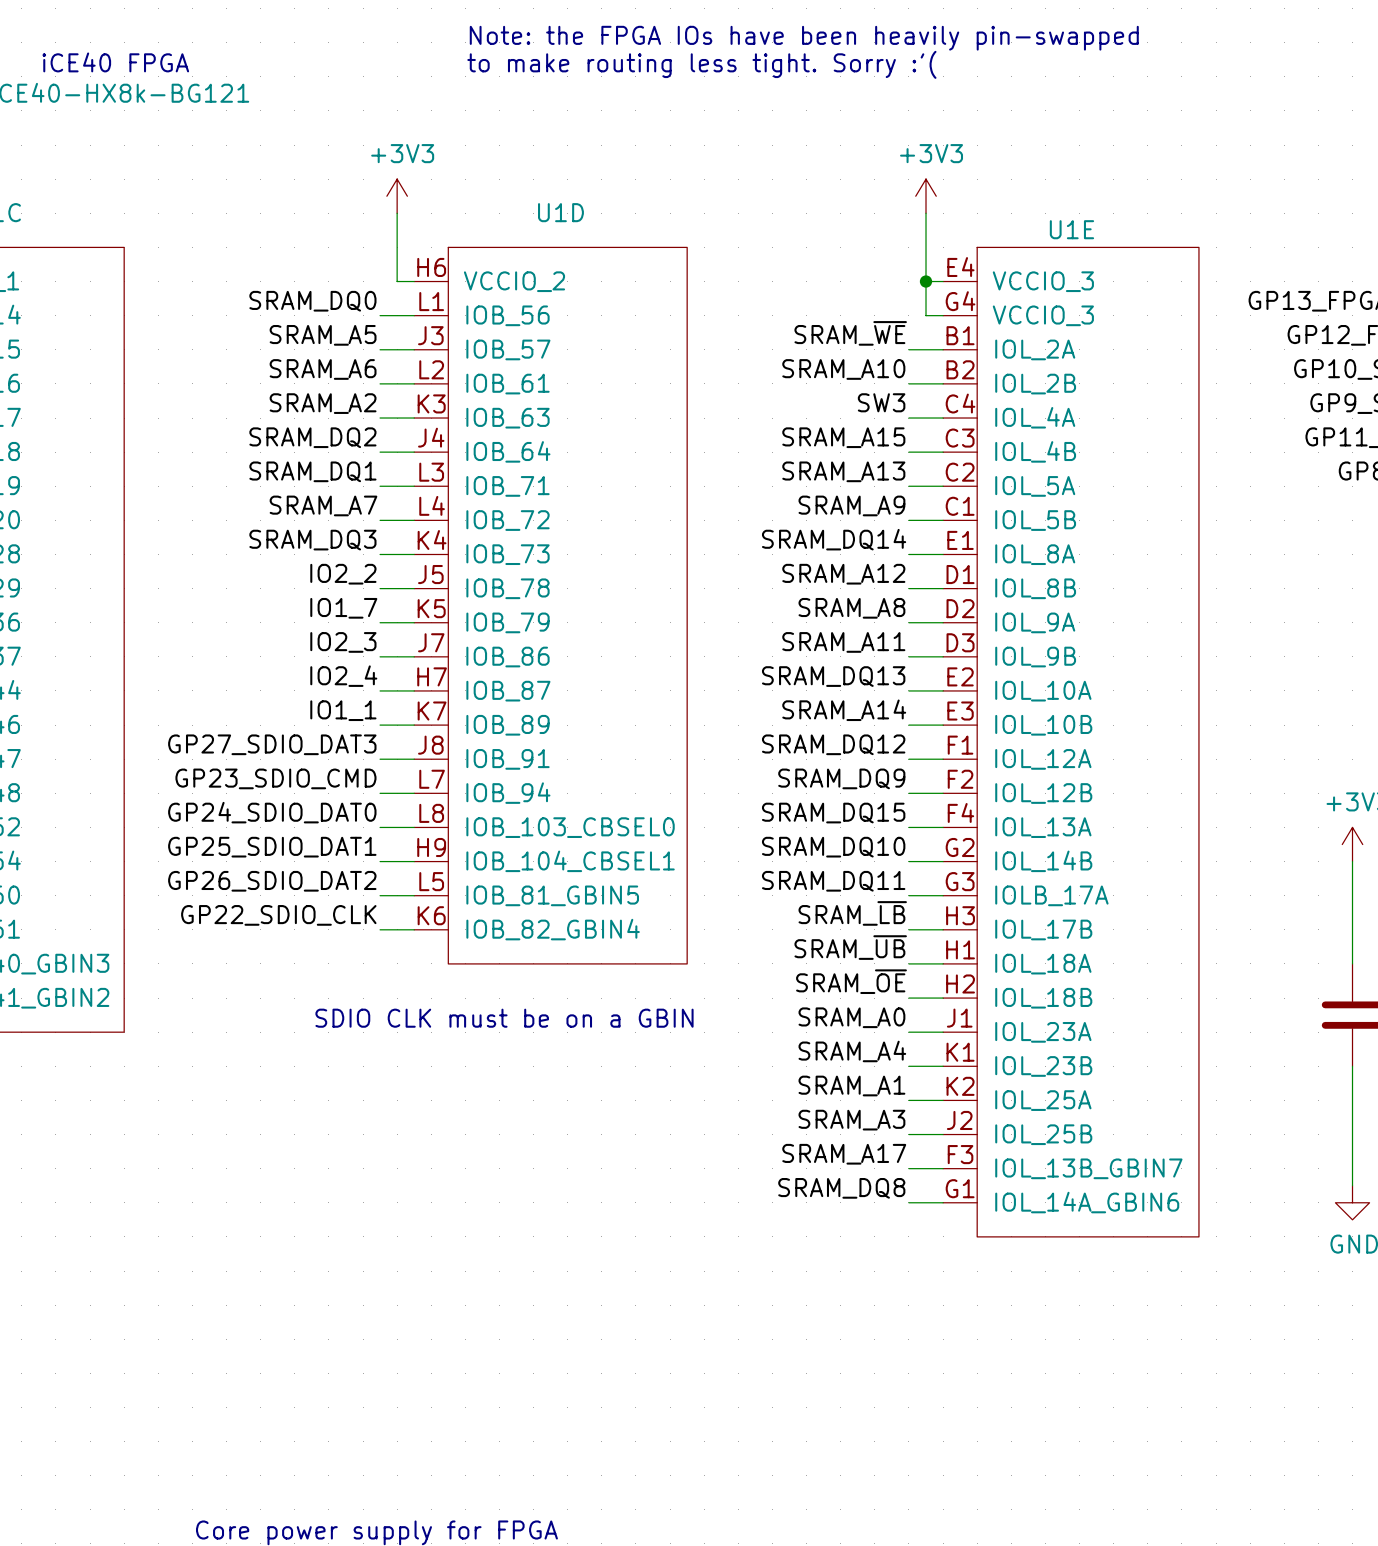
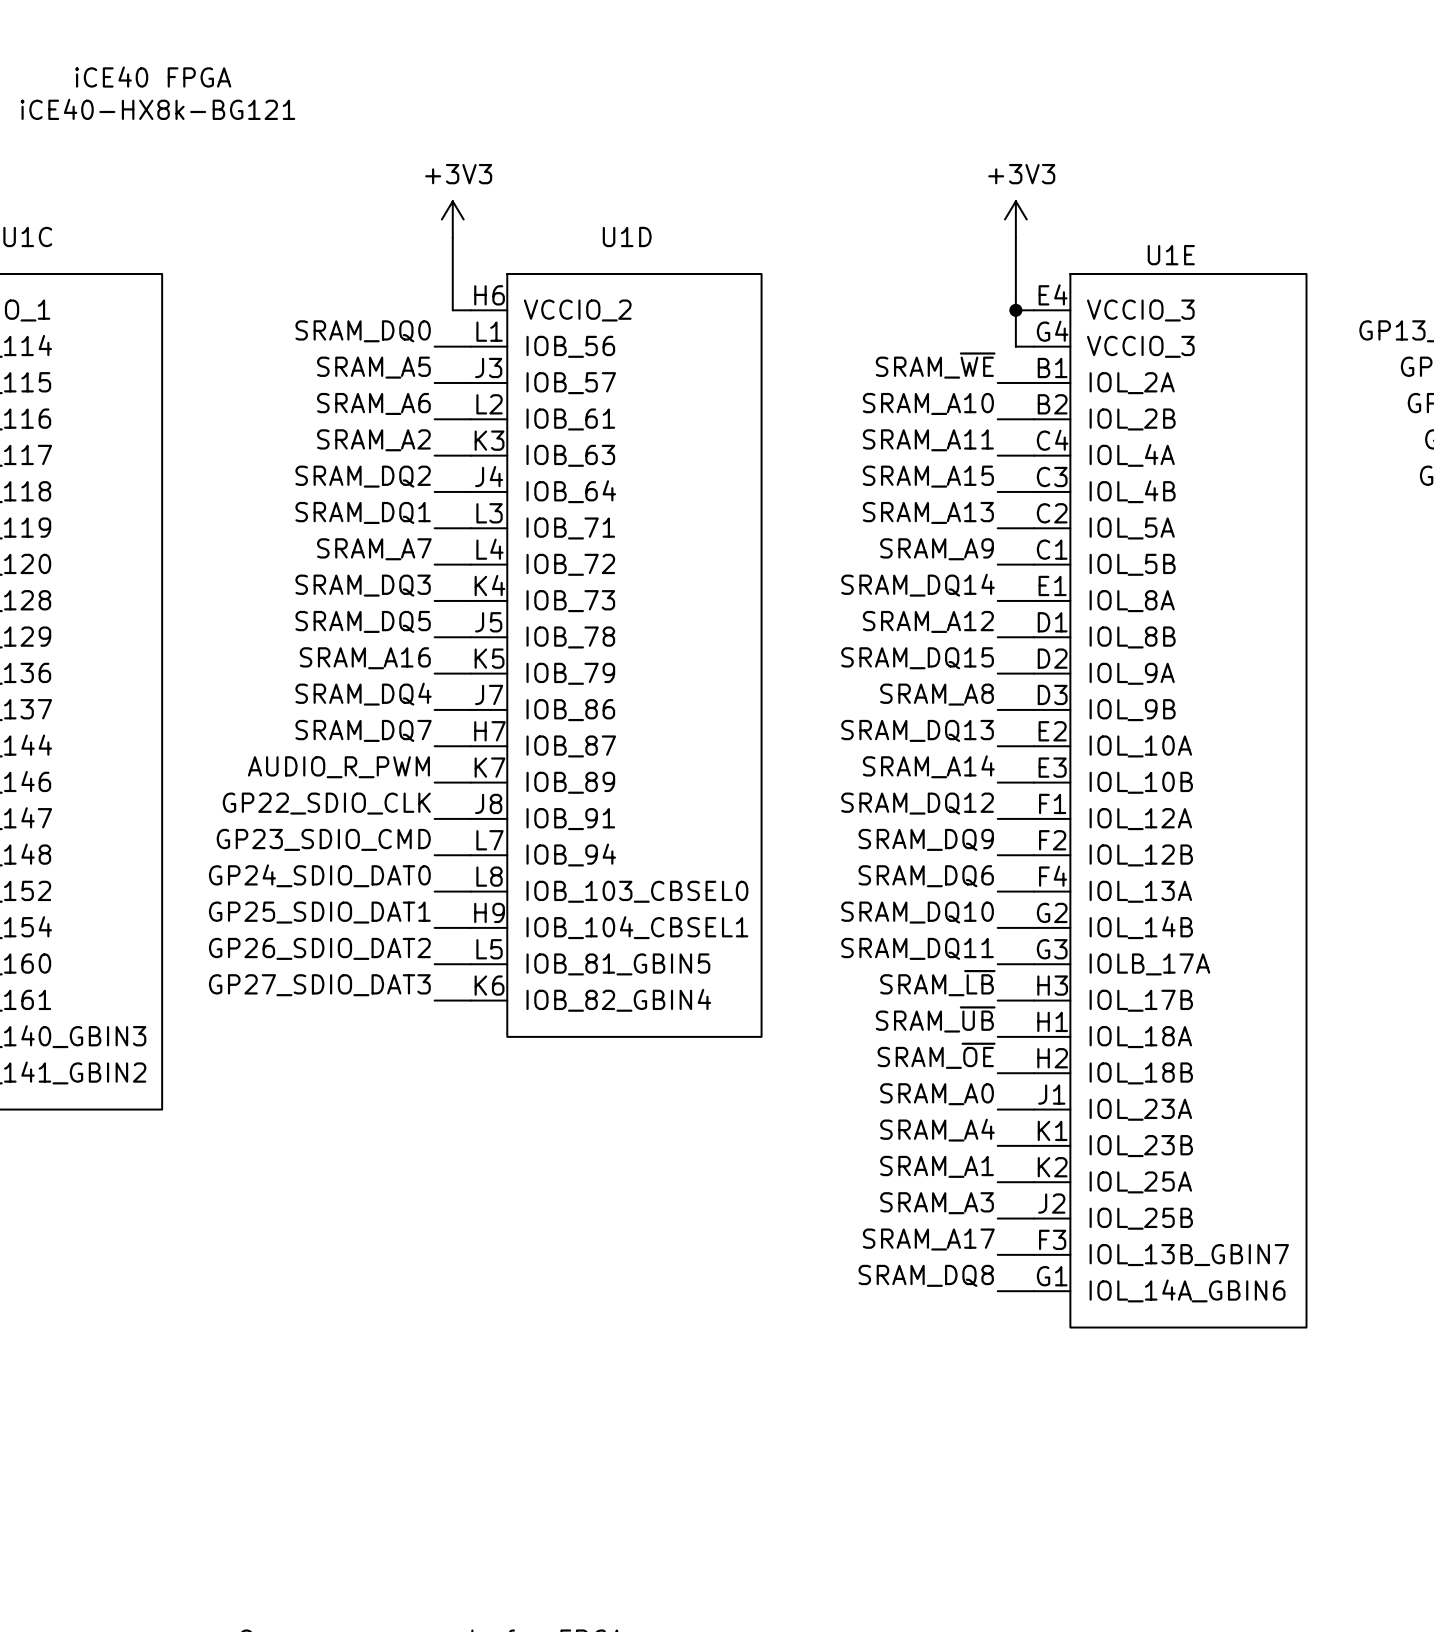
text: Note: the FPGA IOs have been heavily pin-swapped (804, 38) -> none
text: to make routing less tight. Sorry :'( (701, 64) -> none
label: SW3 (881, 402) -> SRAM_A11 (928, 440)
label: IO2_2 (343, 574) -> SRAM_DQ5 (363, 621)
label: IO1_7 (343, 608) -> SRAM_A16 (365, 658)
label: SRAM_A8 (851, 608) -> SRAM_DQ15 (917, 658)
label: IO2_3 (343, 642) -> SRAM_DQ4 (363, 694)
label: SRAM_A11 (843, 642) -> SRAM_A8 (937, 694)
label: IO2_4 (343, 676) -> SRAM_DQ7 (363, 730)
label: IO1_1 (343, 710) -> AUDIO_R_PWM (338, 767)
label: GP27_SDIO_DAT3 (272, 744) -> GP22_SDIO_CLK (326, 803)
label: SRAM_DQ15 (833, 813) -> SRAM_DQ6 (926, 876)
label: GP22_SDIO_CLK (278, 915) -> GP27_SDIO_DAT3 (319, 985)
text: SDIO CLK must be on a GBIN (504, 1018) -> none

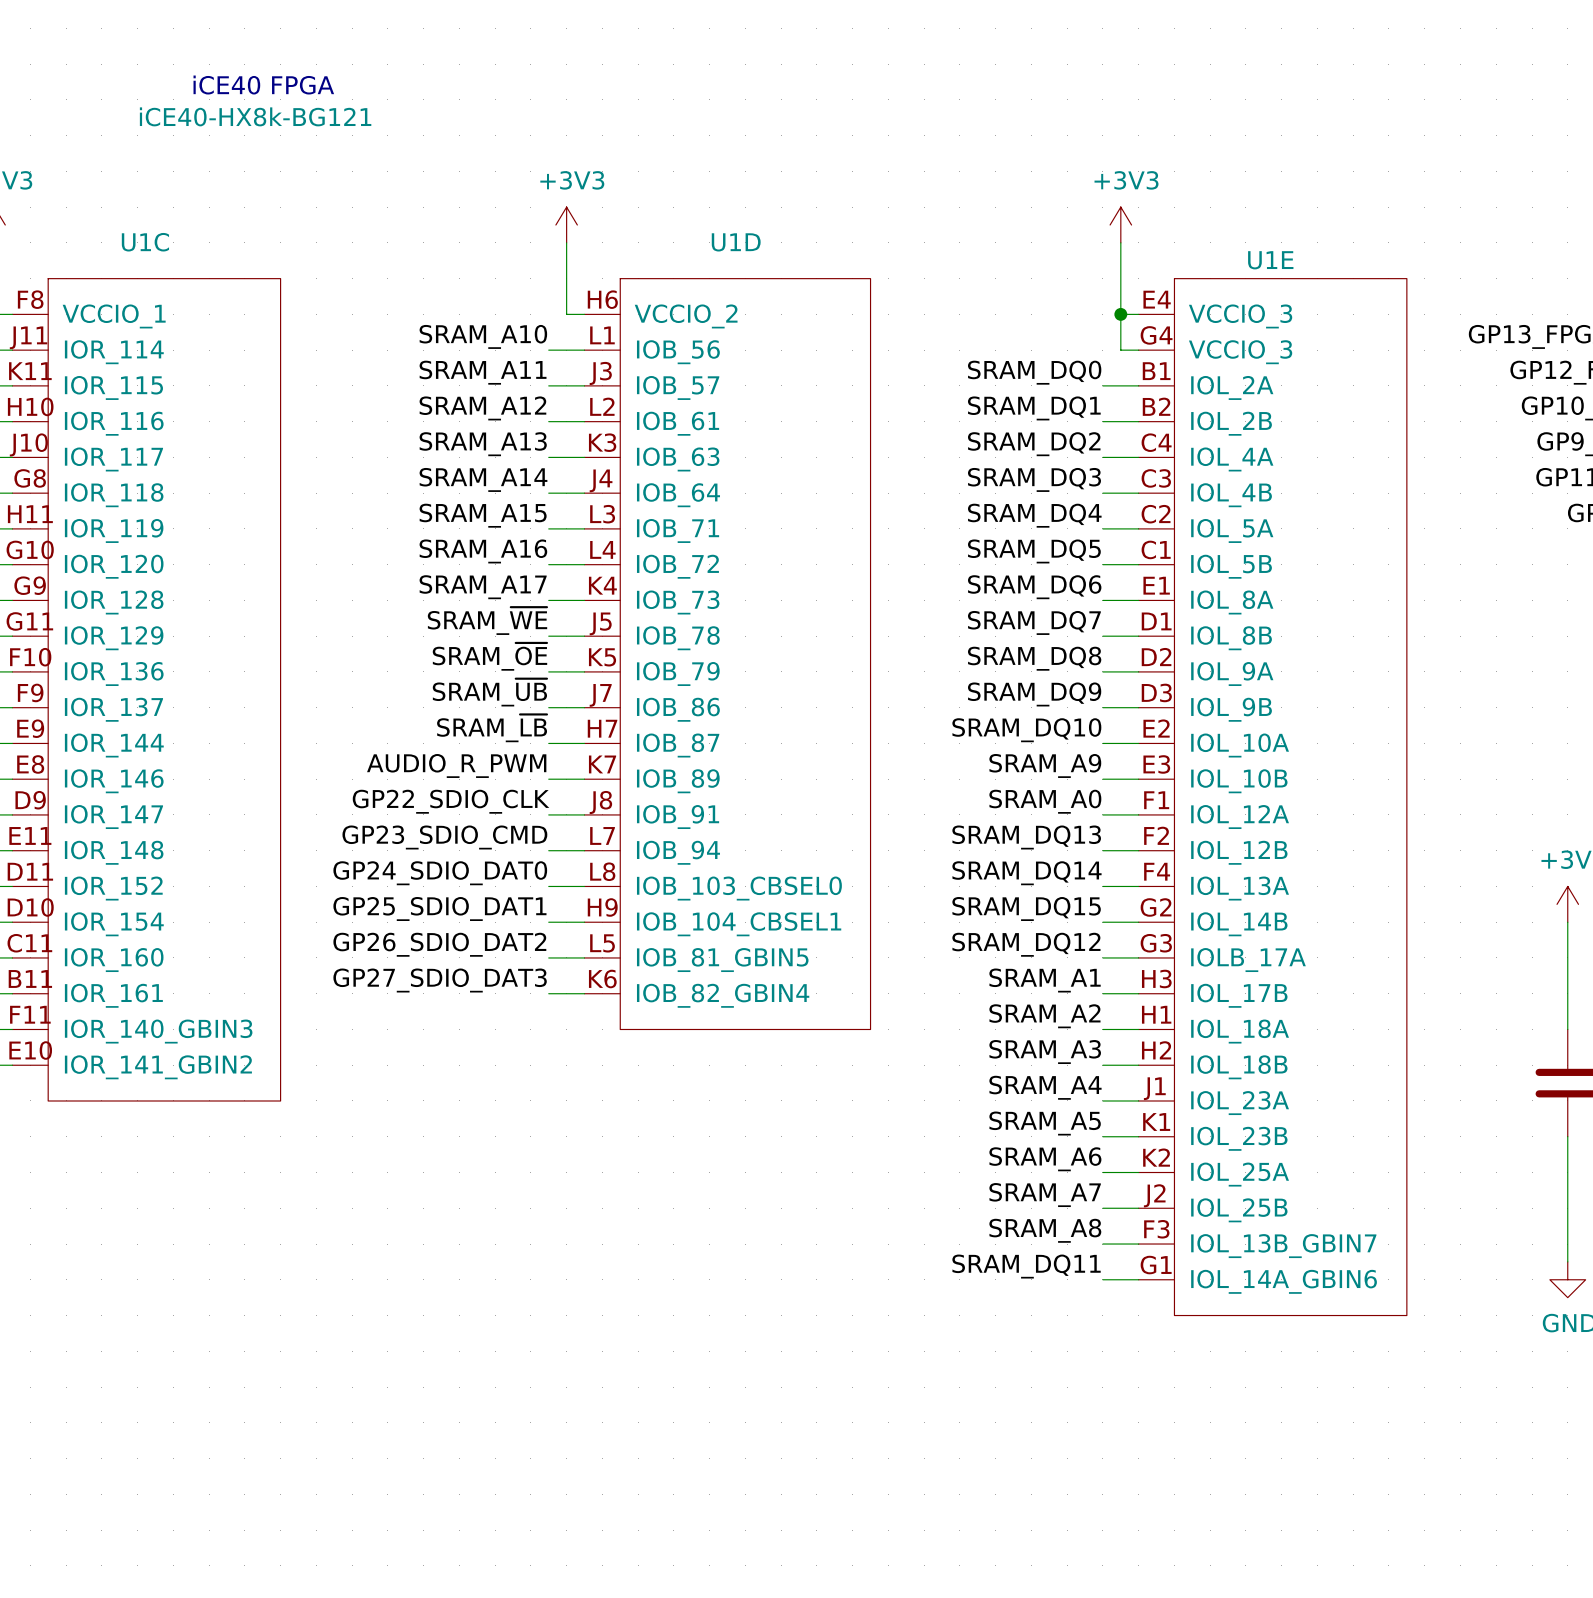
label: SRAM_DQ0 (363, 331) -> SRAM_A10 (483, 336)
label: SRAM_~{WE} (935, 365) -> SRAM_DQ0 (1034, 372)
label: SRAM_A5 (373, 367) -> SRAM_A11 (483, 372)
label: SRAM_A6 (373, 403) -> SRAM_A12 (482, 408)
label: SRAM_A10 (928, 403) -> SRAM_DQ1 (1034, 408)
label: SRAM_A2 (373, 440) -> SRAM_A13 (483, 444)
label: SRAM_A11 (928, 440) -> SRAM_DQ2 (1034, 444)
label: SRAM_DQ2 (363, 476) -> SRAM_A14 (483, 479)
label: SRAM_A15 (928, 476) -> SRAM_DQ3 (1034, 479)
label: SRAM_DQ1 (363, 512) -> SRAM_A15 (483, 515)
label: SRAM_A13 (928, 512) -> SRAM_DQ4 (1034, 515)
label: SRAM_A7 (374, 549) -> SRAM_A16 (483, 551)
label: SRAM_A9 (937, 549) -> SRAM_DQ5 (1034, 551)
label: SRAM_DQ3 (363, 585) -> SRAM_A17 (483, 587)
label: SRAM_DQ14 (918, 585) -> SRAM_DQ6 (1034, 587)
label: SRAM_DQ5 (363, 621) -> SRAM_~{WE} (487, 621)
label: SRAM_A12 (928, 621) -> SRAM_DQ7 (1034, 622)
label: SRAM_A16 (365, 658) -> SRAM_~{OE} (489, 656)
label: SRAM_DQ15 (917, 658) -> SRAM_DQ8 (1034, 658)
label: SRAM_DQ4 (363, 694) -> SRAM_~{UB} (489, 692)
label: SRAM_A8 (937, 694) -> SRAM_DQ9 (1034, 694)
label: SRAM_DQ7 (363, 730) -> SRAM_~{LB} (492, 728)
label: SRAM_DQ13 (917, 730) -> SRAM_DQ10 (1026, 730)
label: SRAM_A14 (928, 766) -> SRAM_A9 (1045, 765)
label: SRAM_DQ12 (917, 803) -> SRAM_A0 (1045, 801)
label: SRAM_DQ9 (926, 839) -> SRAM_DQ13 (1026, 837)
label: SRAM_DQ6 (926, 876) -> SRAM_DQ14 (1026, 873)
label: SRAM_DQ10 (917, 912) -> SRAM_DQ15 (1026, 909)
label: SRAM_DQ11 (917, 948) -> SRAM_DQ12 (1026, 944)
label: SRAM_~{LB} (937, 983) -> SRAM_A1 (1045, 980)
label: SRAM_~{UB} (935, 1019) -> SRAM_A2 (1044, 1016)
label: SRAM_~{OE} (936, 1055) -> SRAM_A3 (1045, 1052)
label: SRAM_A0 (937, 1094) -> SRAM_A4 (1045, 1087)
label: SRAM_A4 (937, 1130) -> SRAM_A5 (1045, 1123)
label: SRAM_A1 (937, 1166) -> SRAM_A6 (1045, 1159)
label: SRAM_A3 (937, 1203) -> SRAM_A7 (1045, 1195)
label: SRAM_A17 (928, 1239) -> SRAM_A8 (1045, 1230)
label: SRAM_DQ8 (926, 1275) -> SRAM_DQ11 (1026, 1266)

